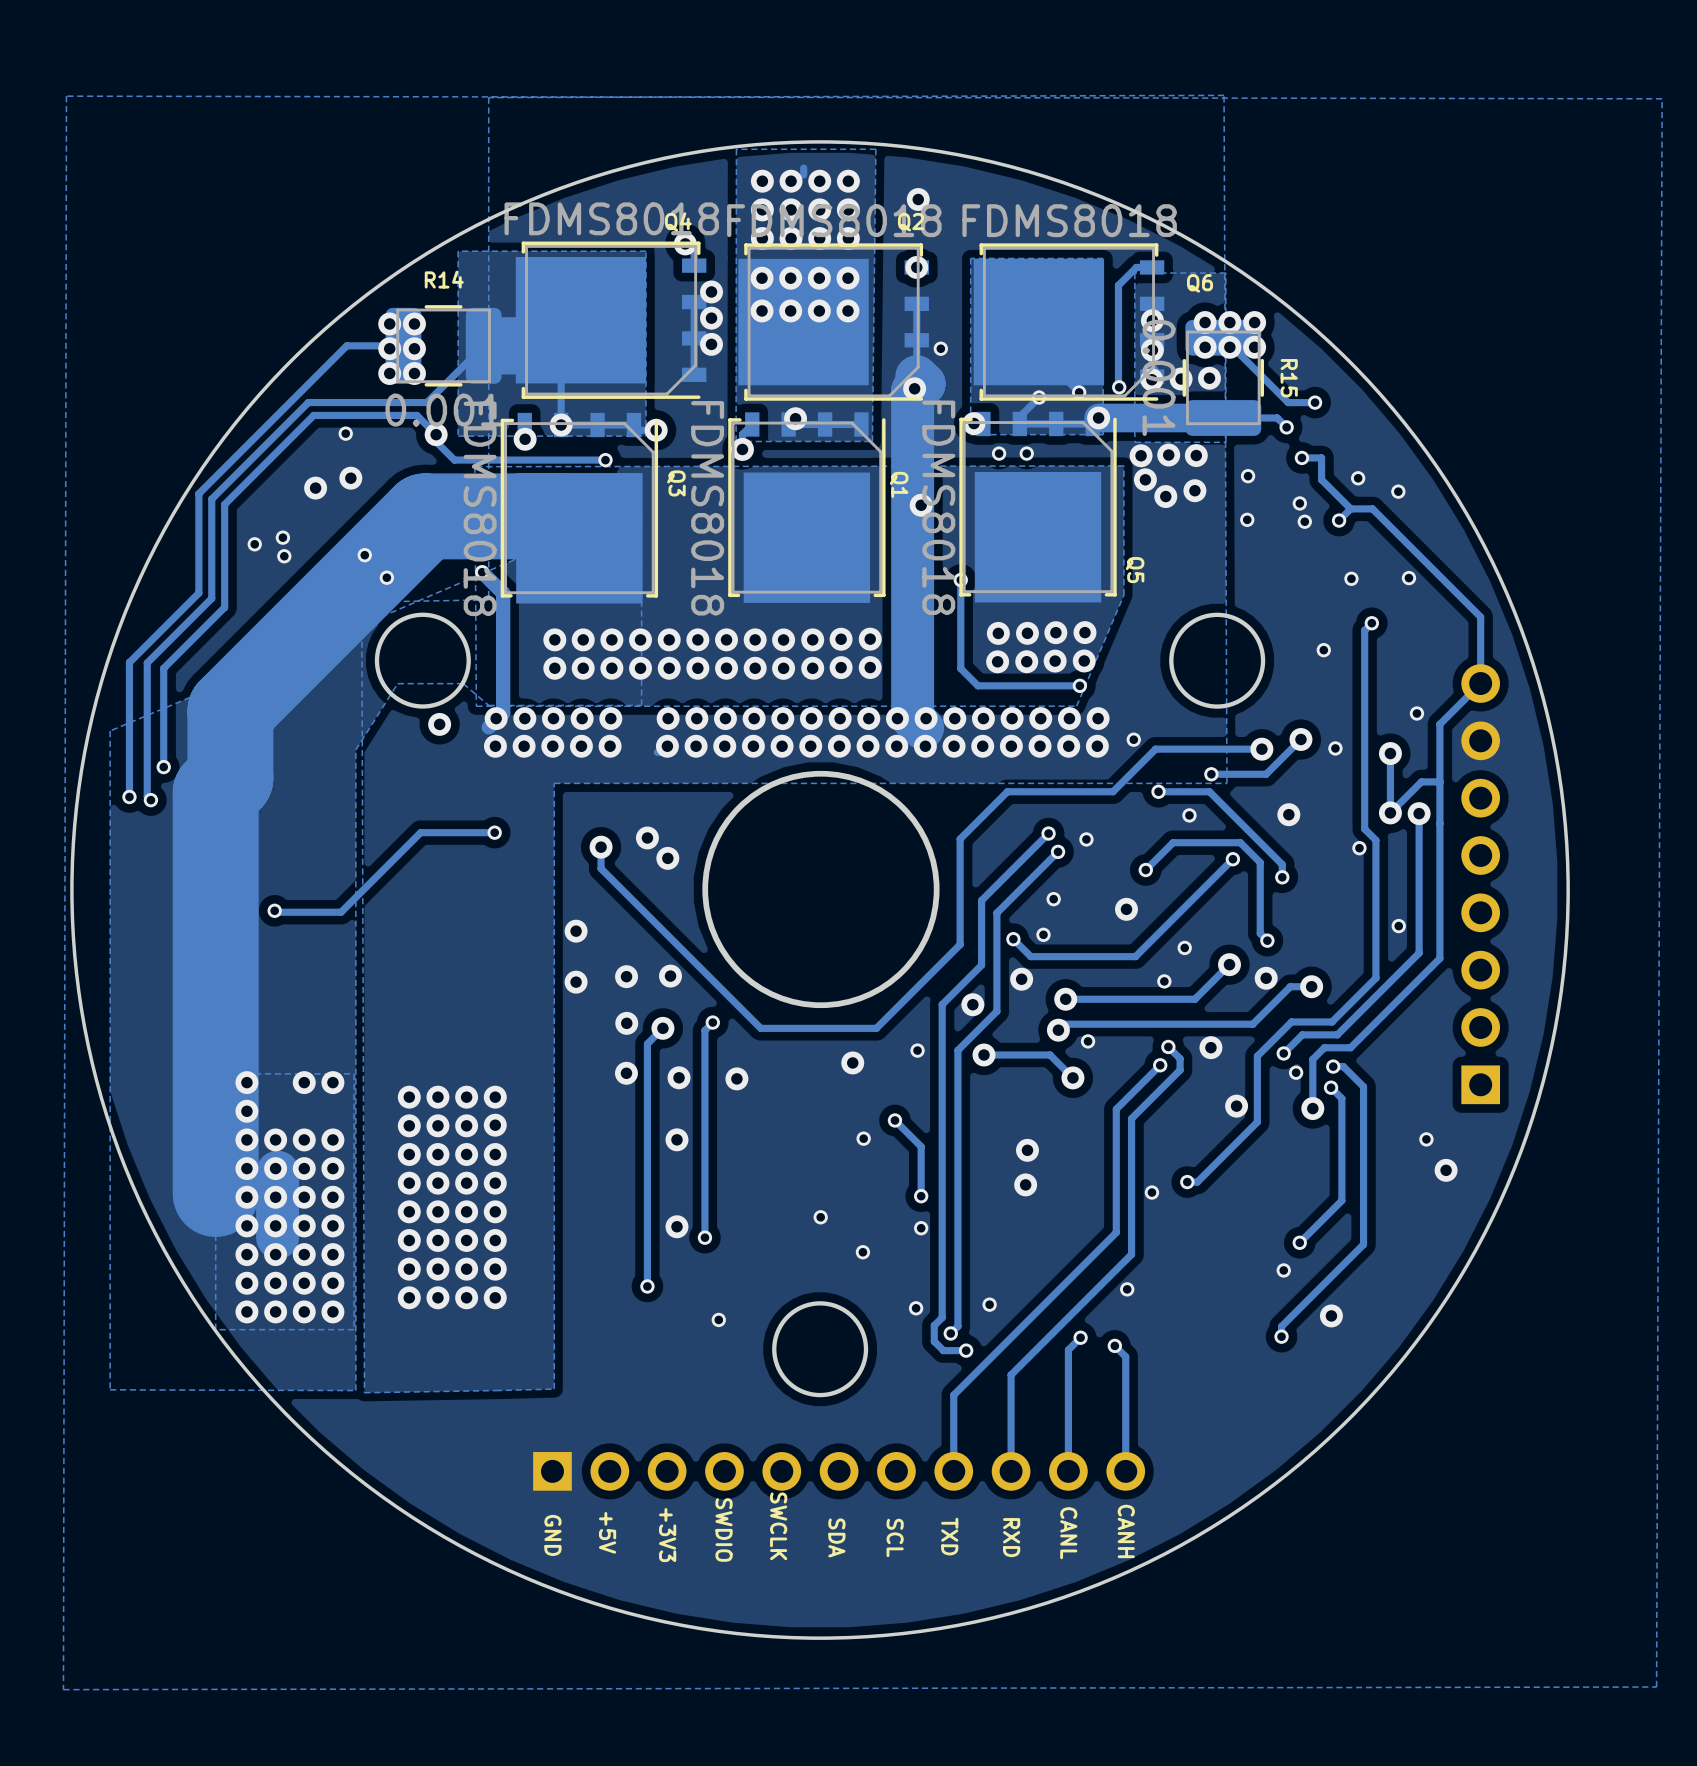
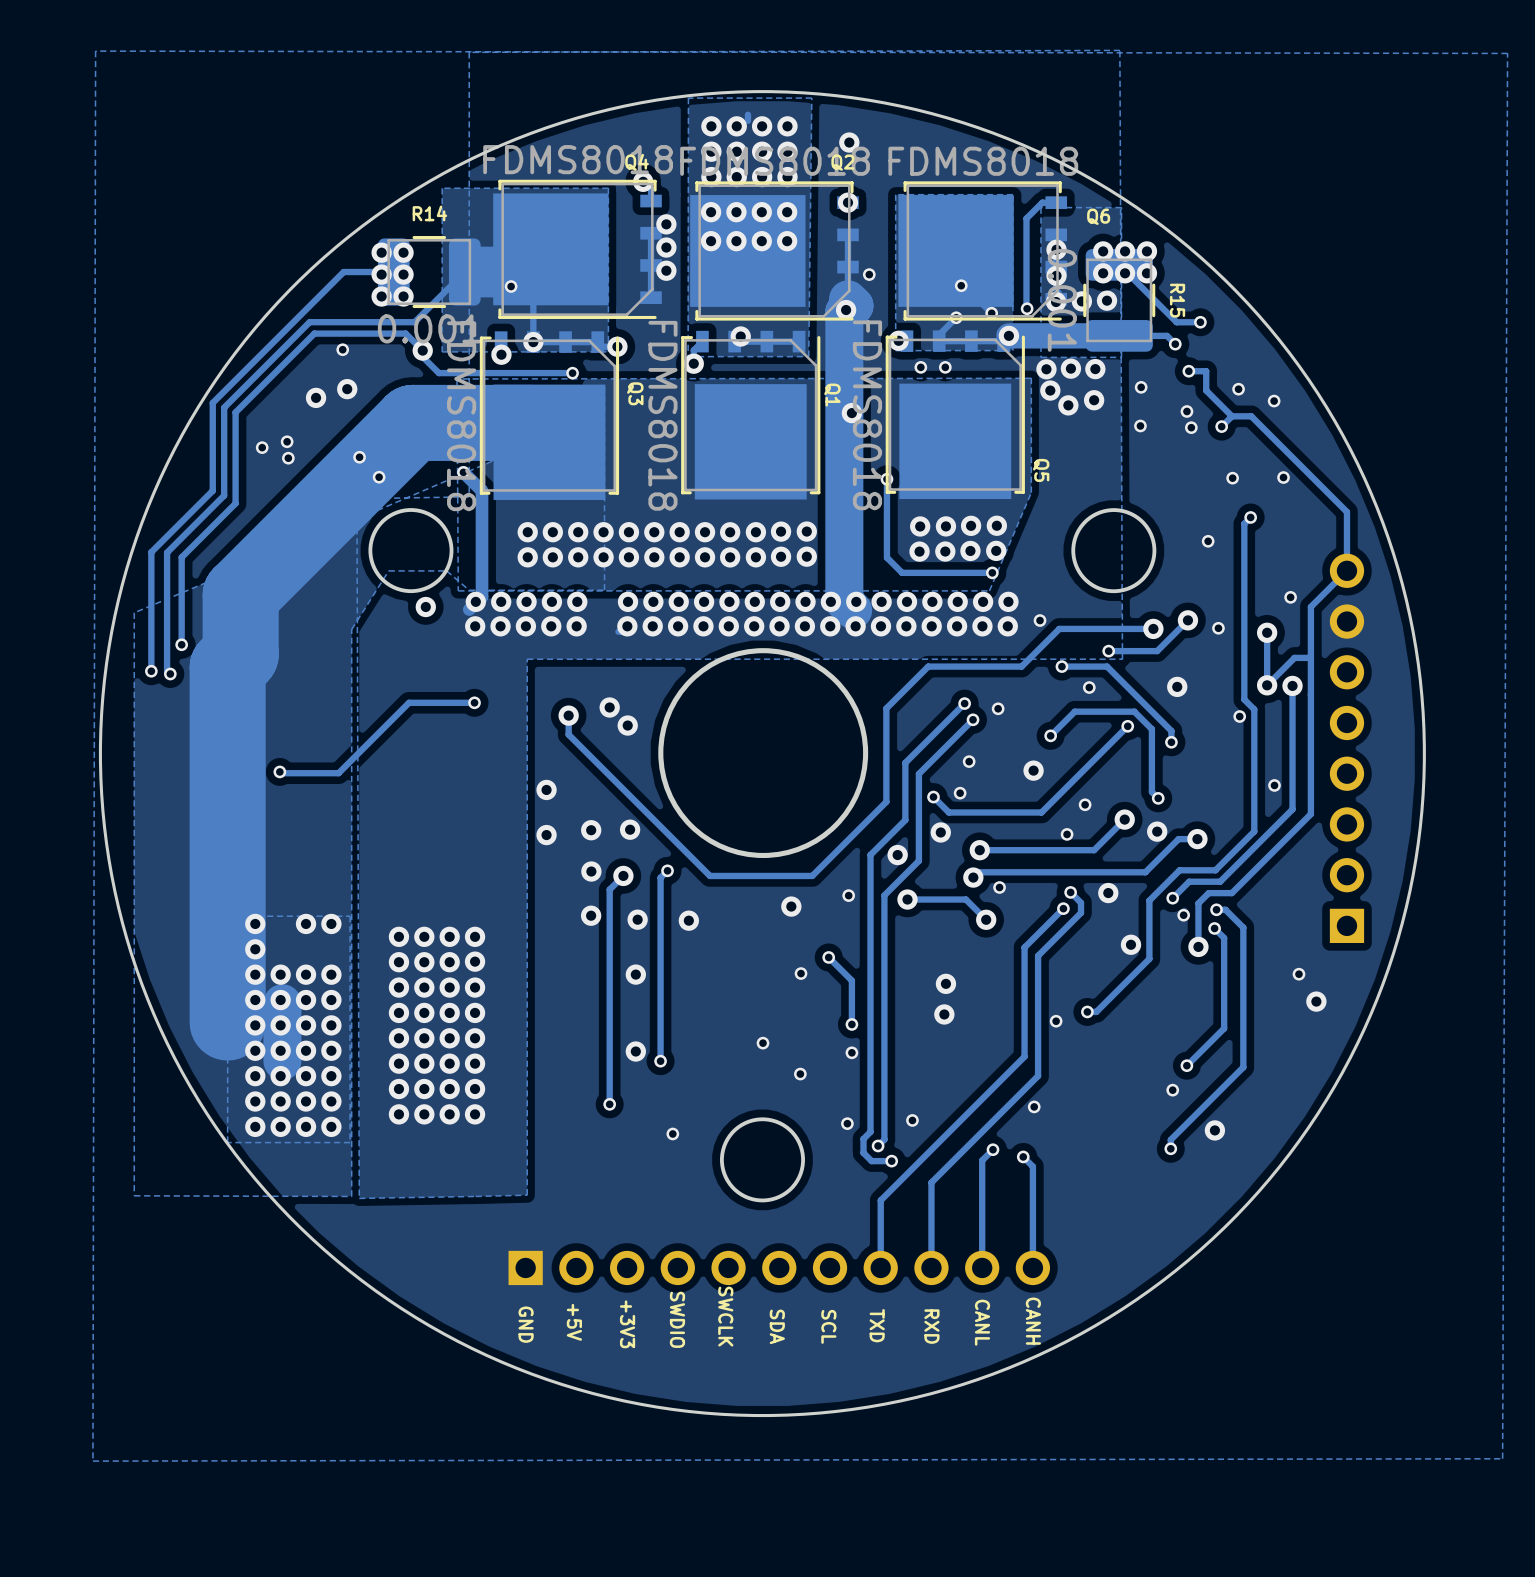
via: none -> (961, 285)
via: none -> (511, 286)

